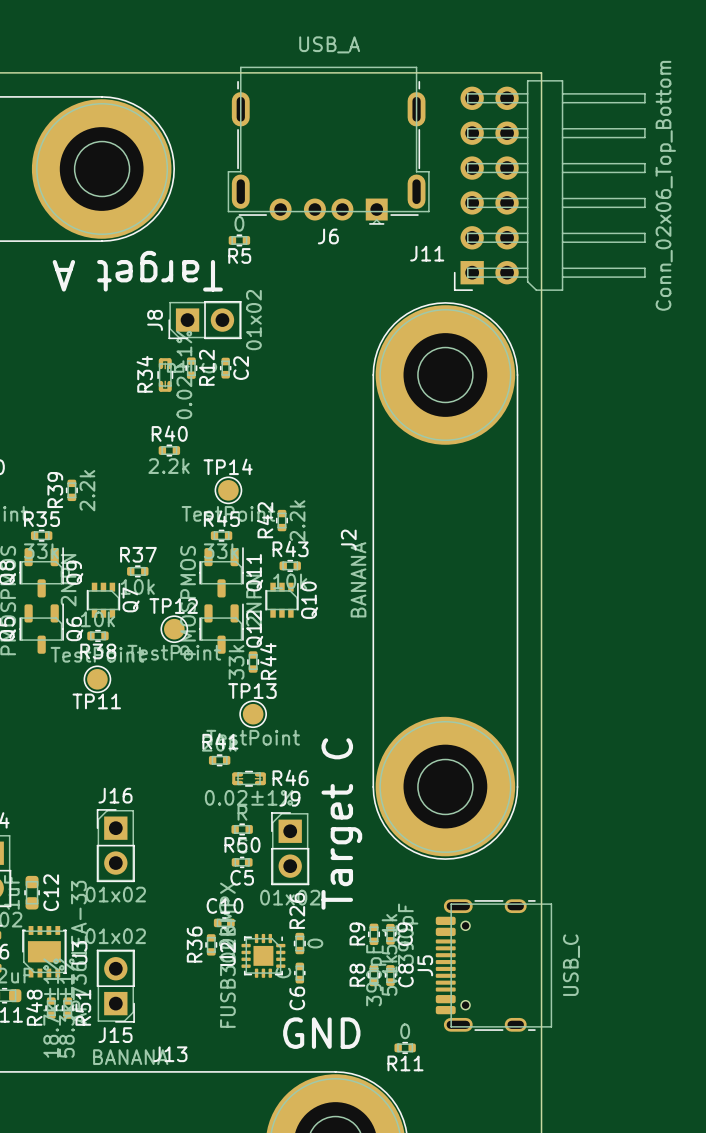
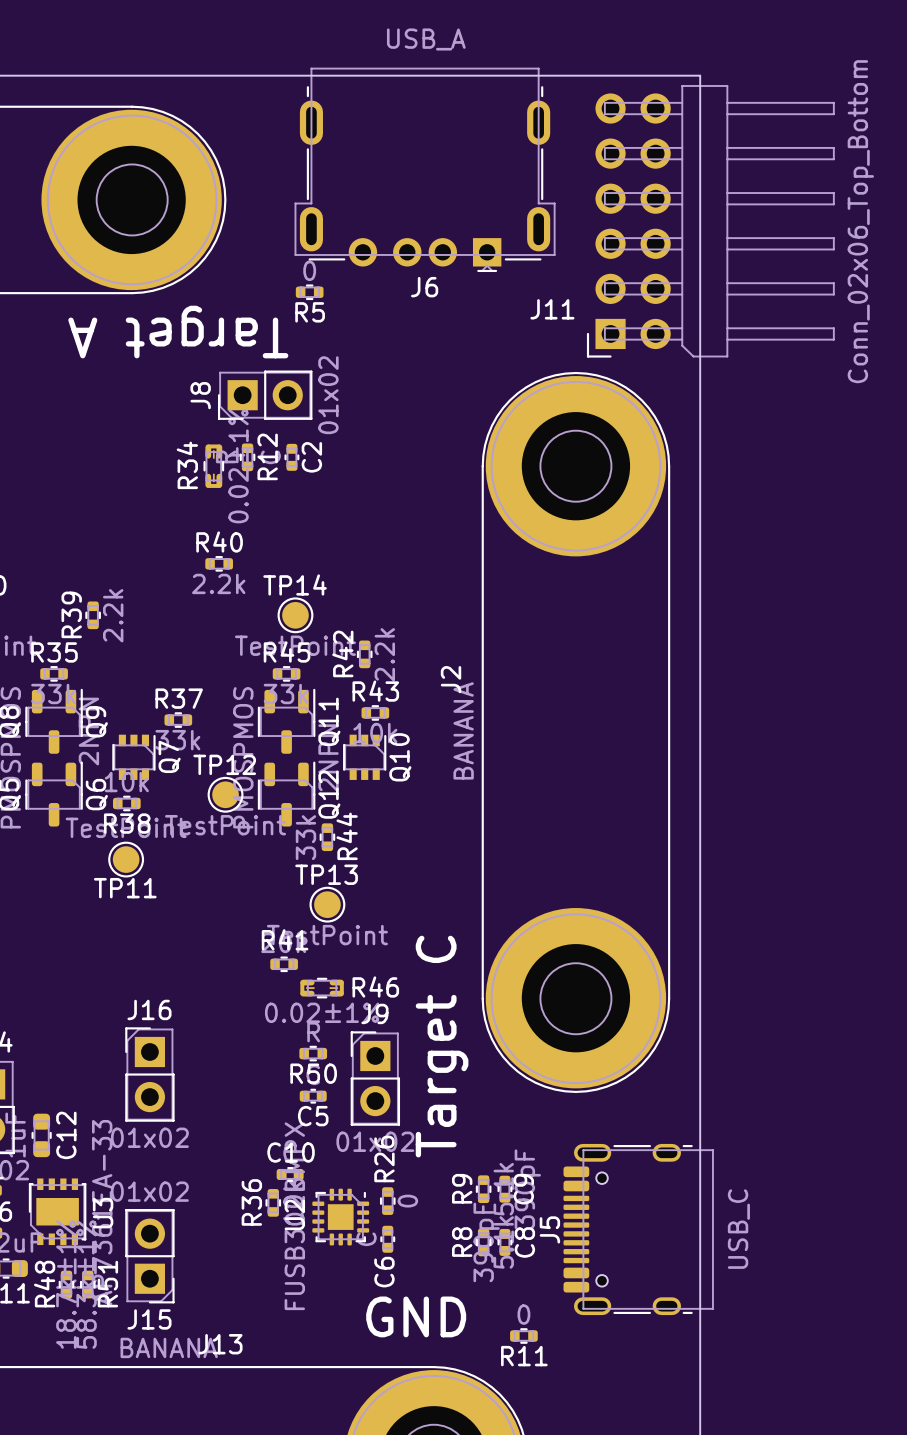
R37 value: 10k (137, 586) -> 33k (177, 740)

